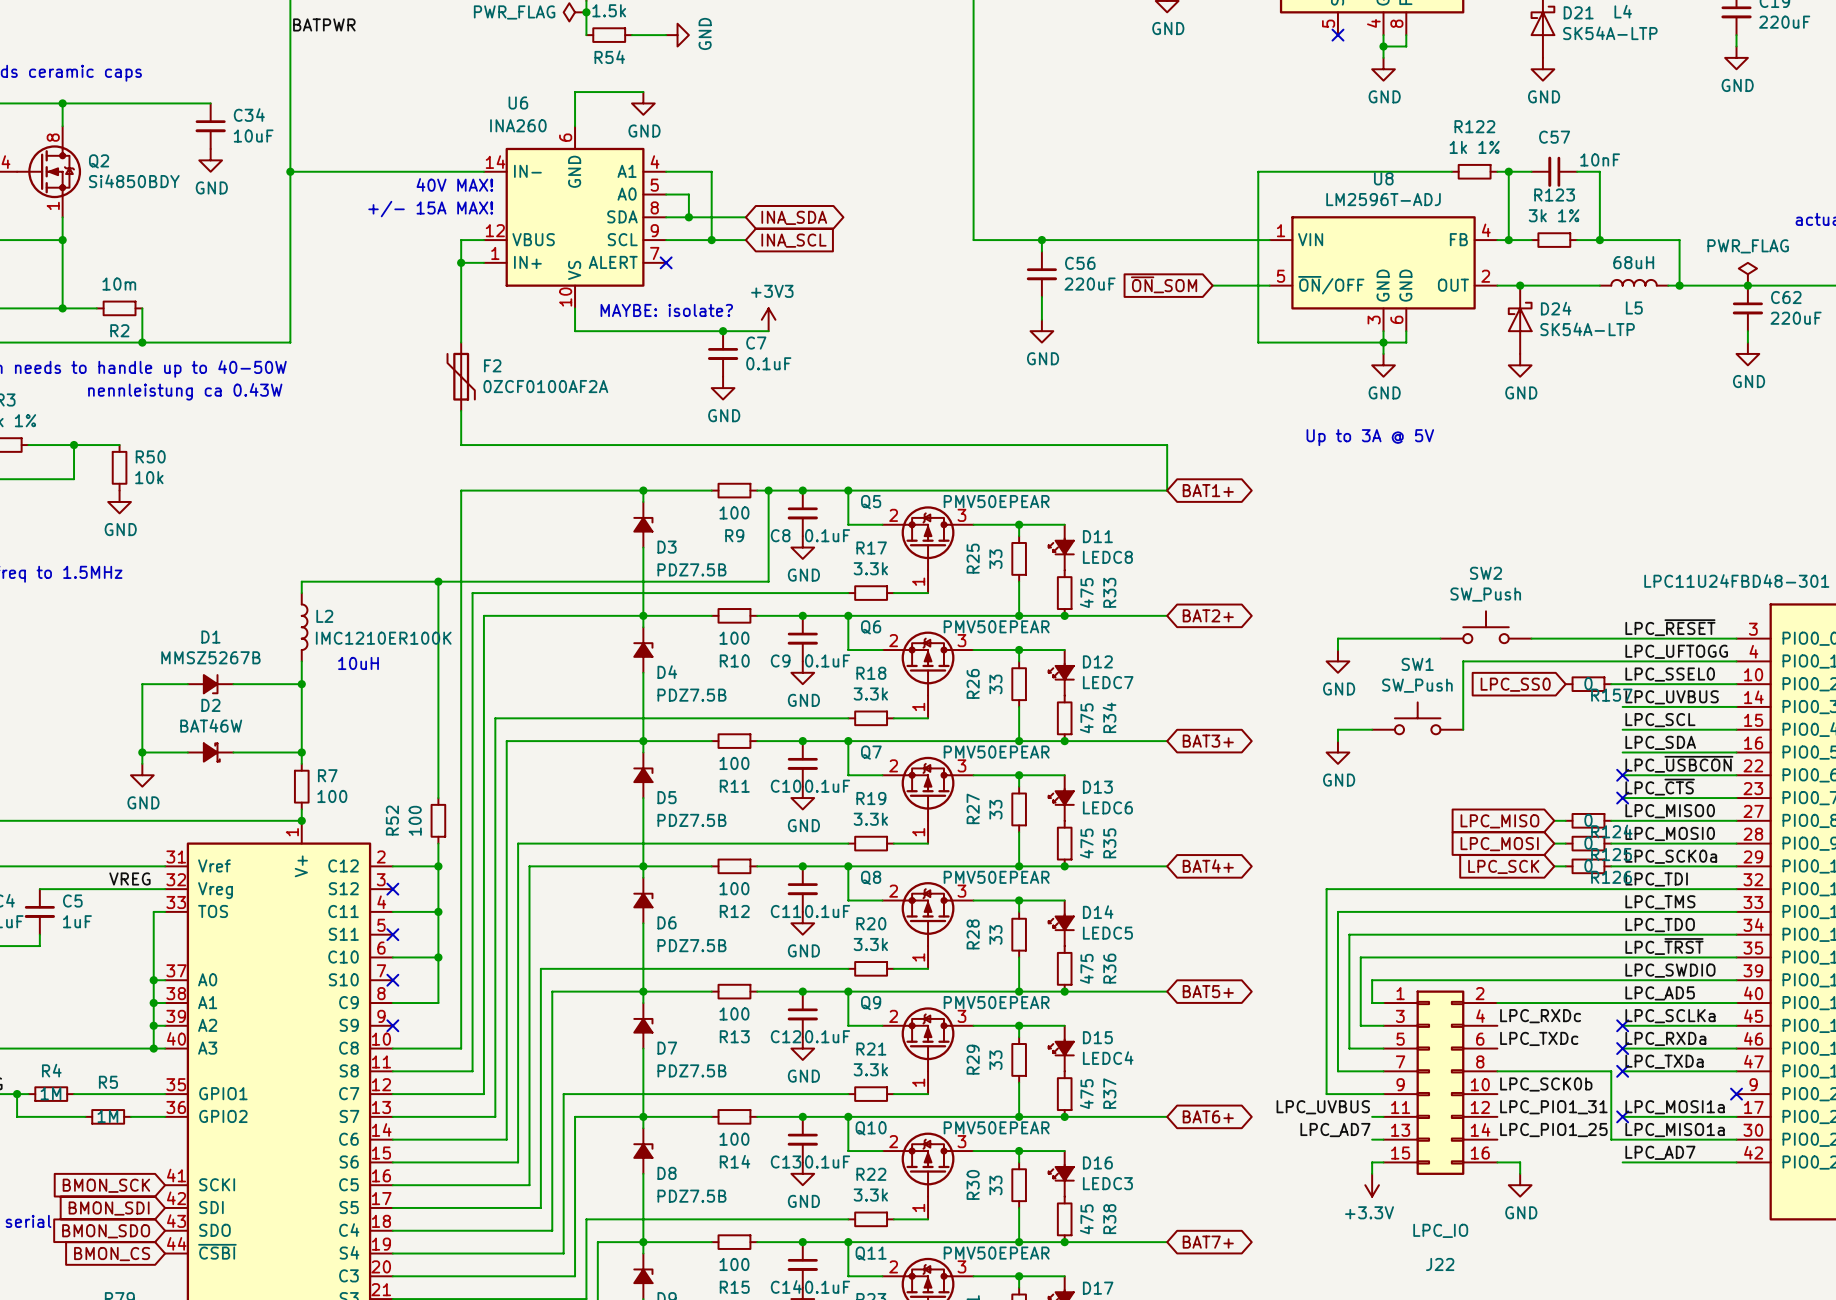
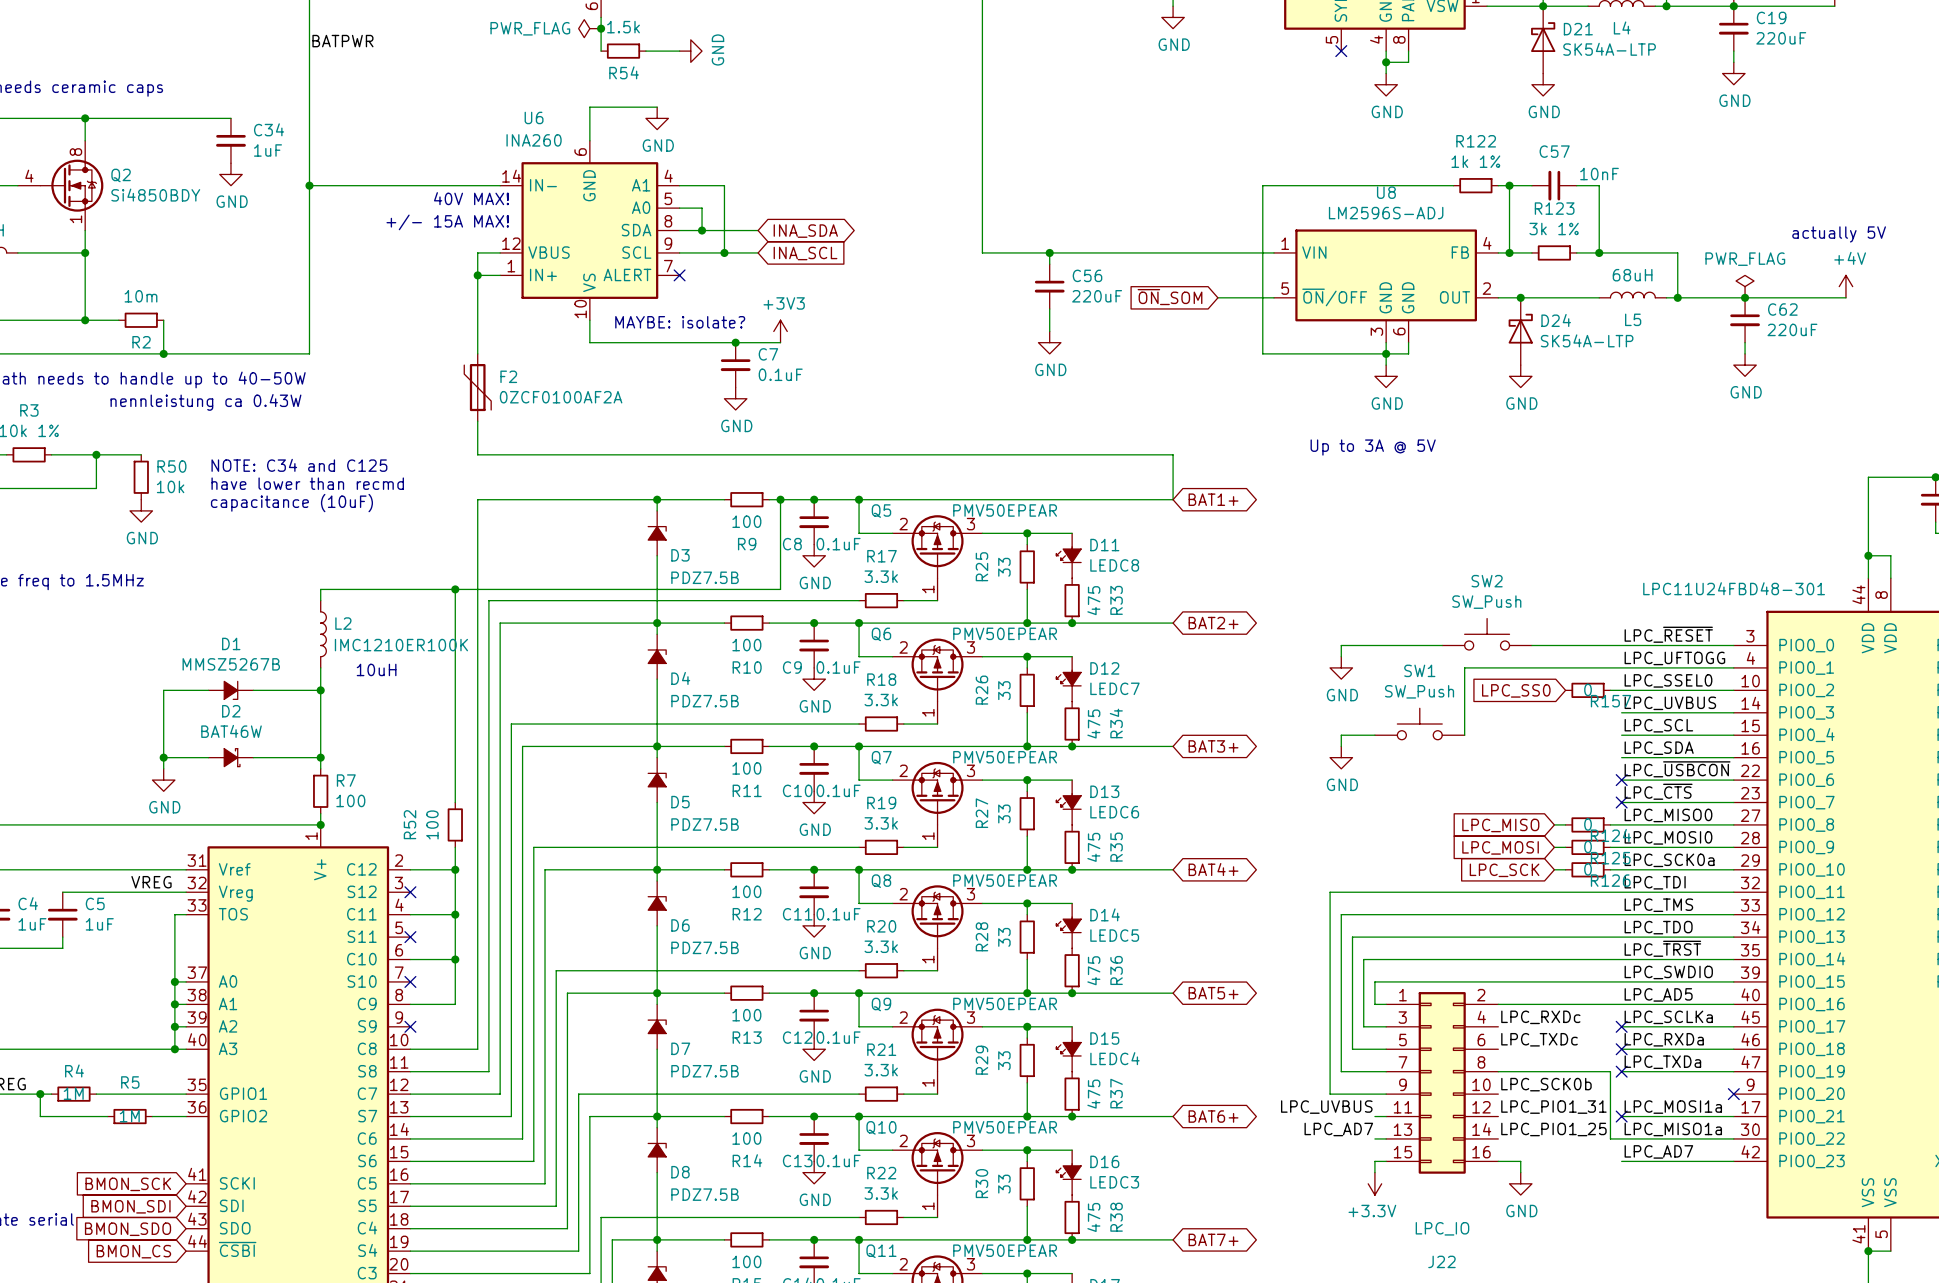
C34 value: 10uF (253, 136) -> 1uF (267, 150)
U8 value: LM2596T-ADJ (1383, 199) -> LM2596S-ADJ (1386, 213)
text: none -> NOTE: C34 and C125 (299, 465)
text: none -> have lower than recmd (307, 483)
text: none -> capacitance (10uF) (291, 503)

